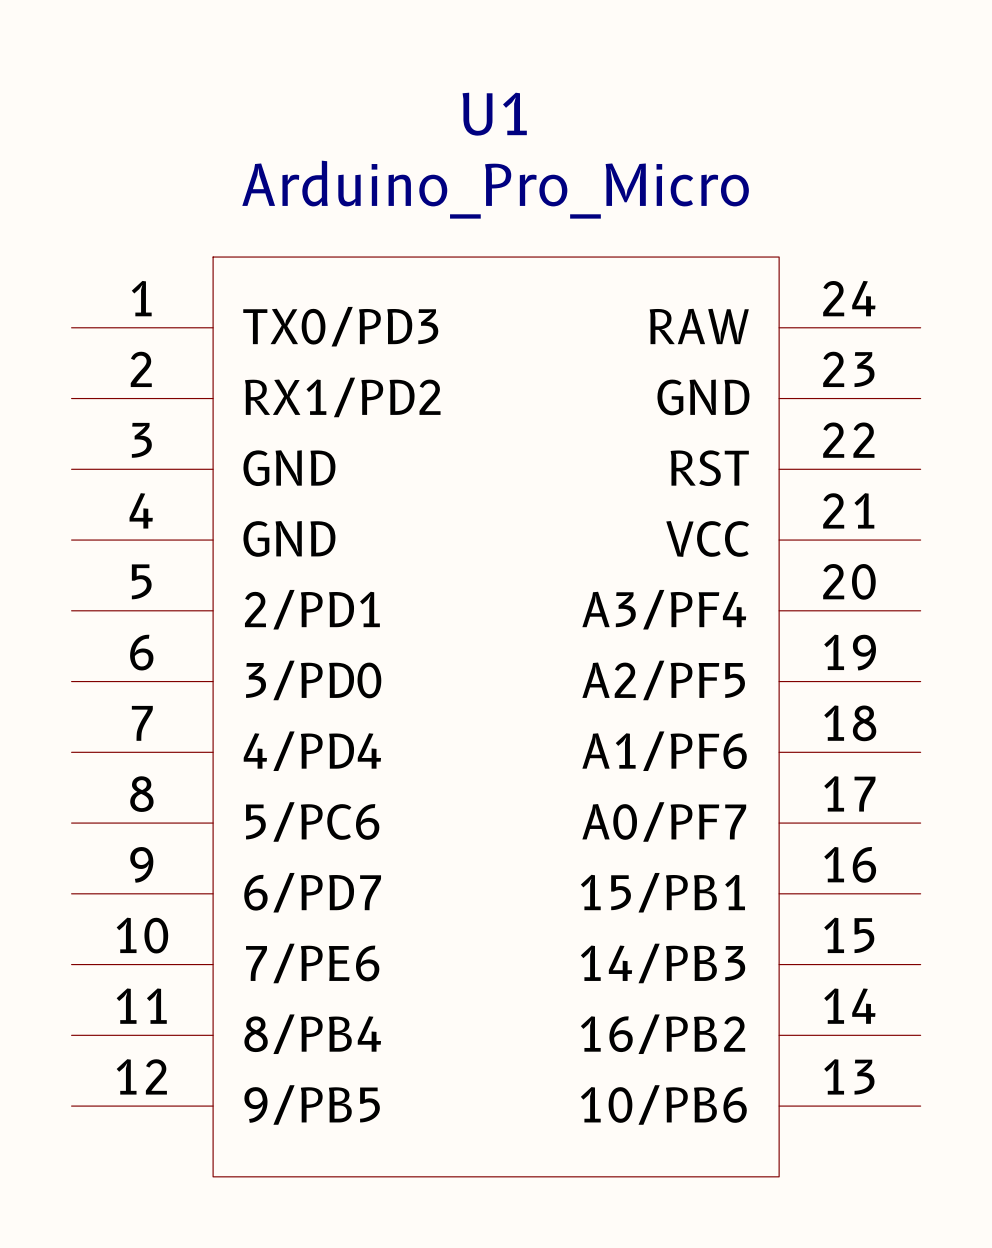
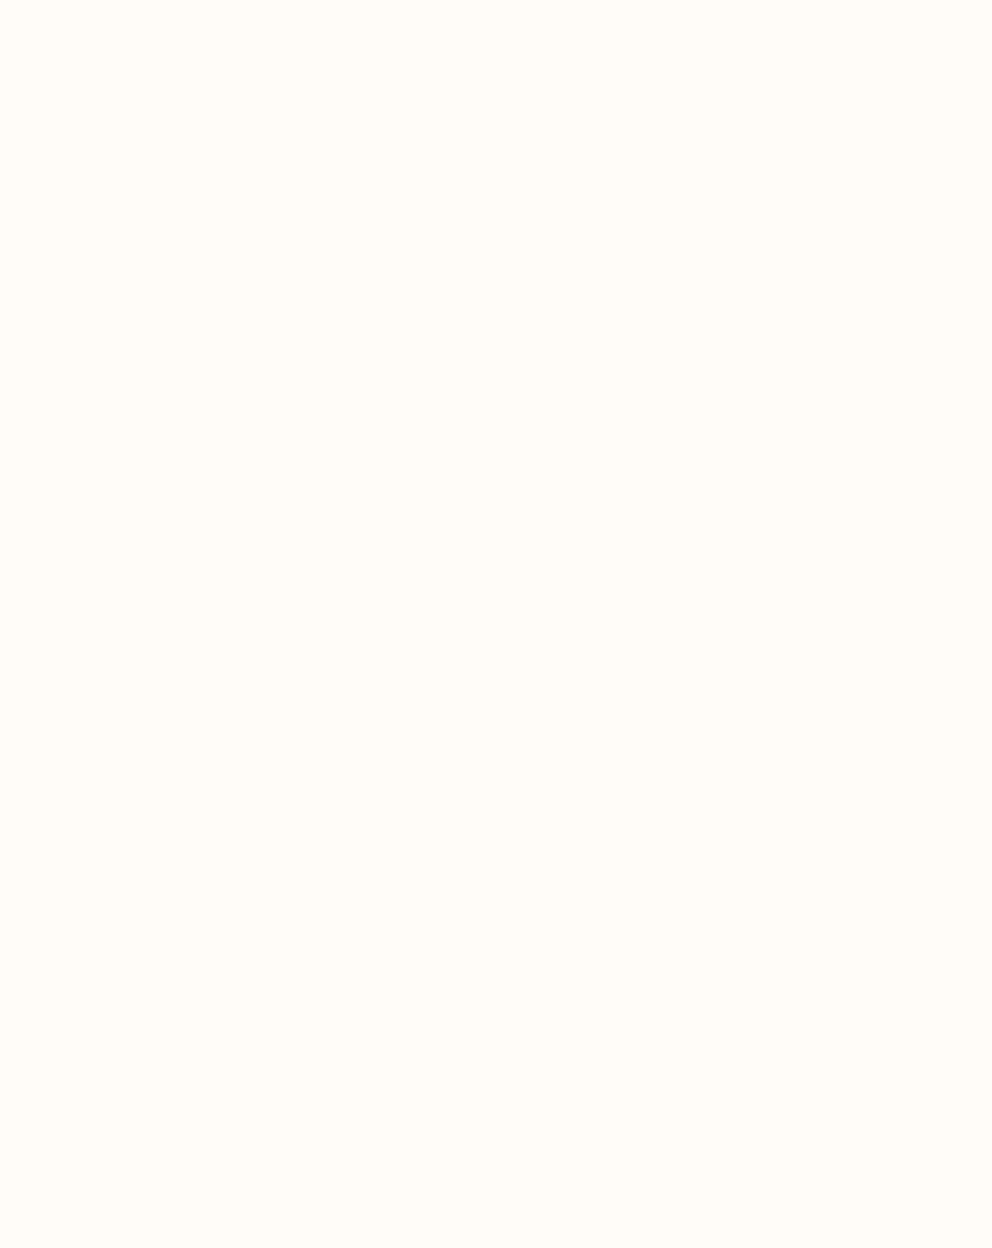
U1: Arduino_Pro_Micro (496, 716) -> none

